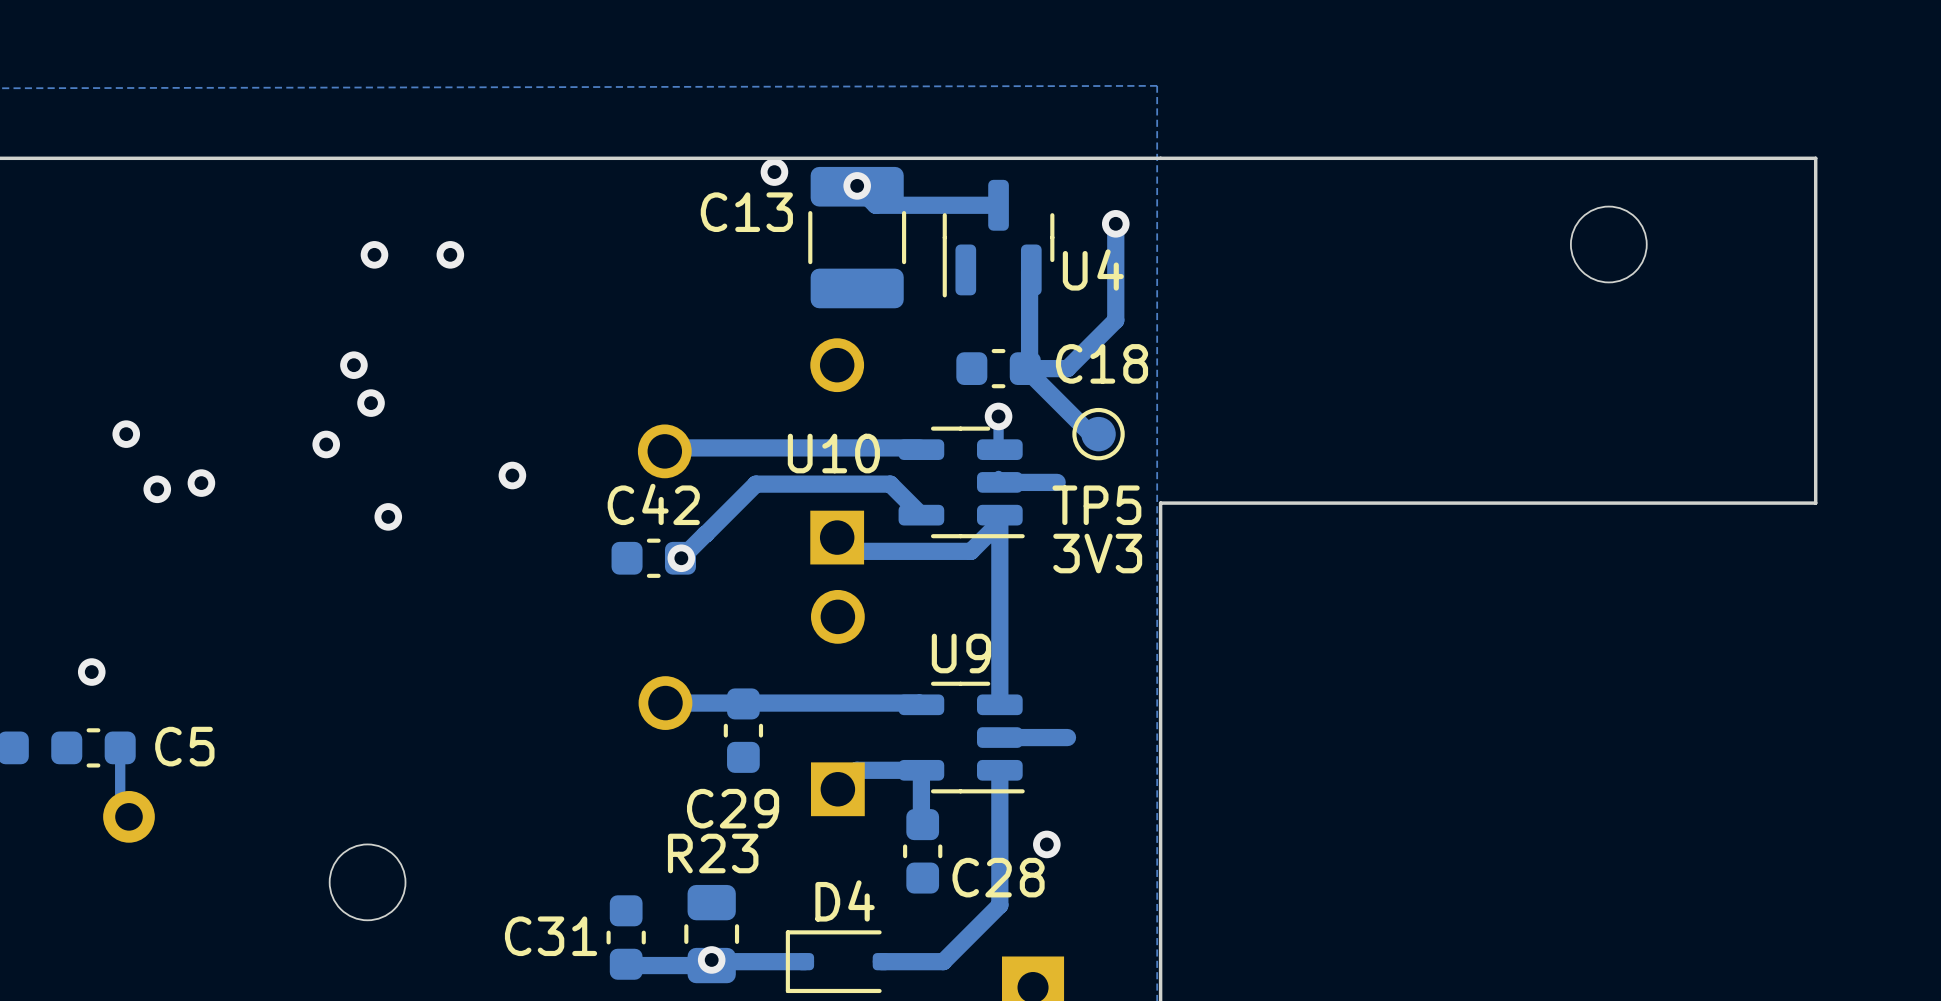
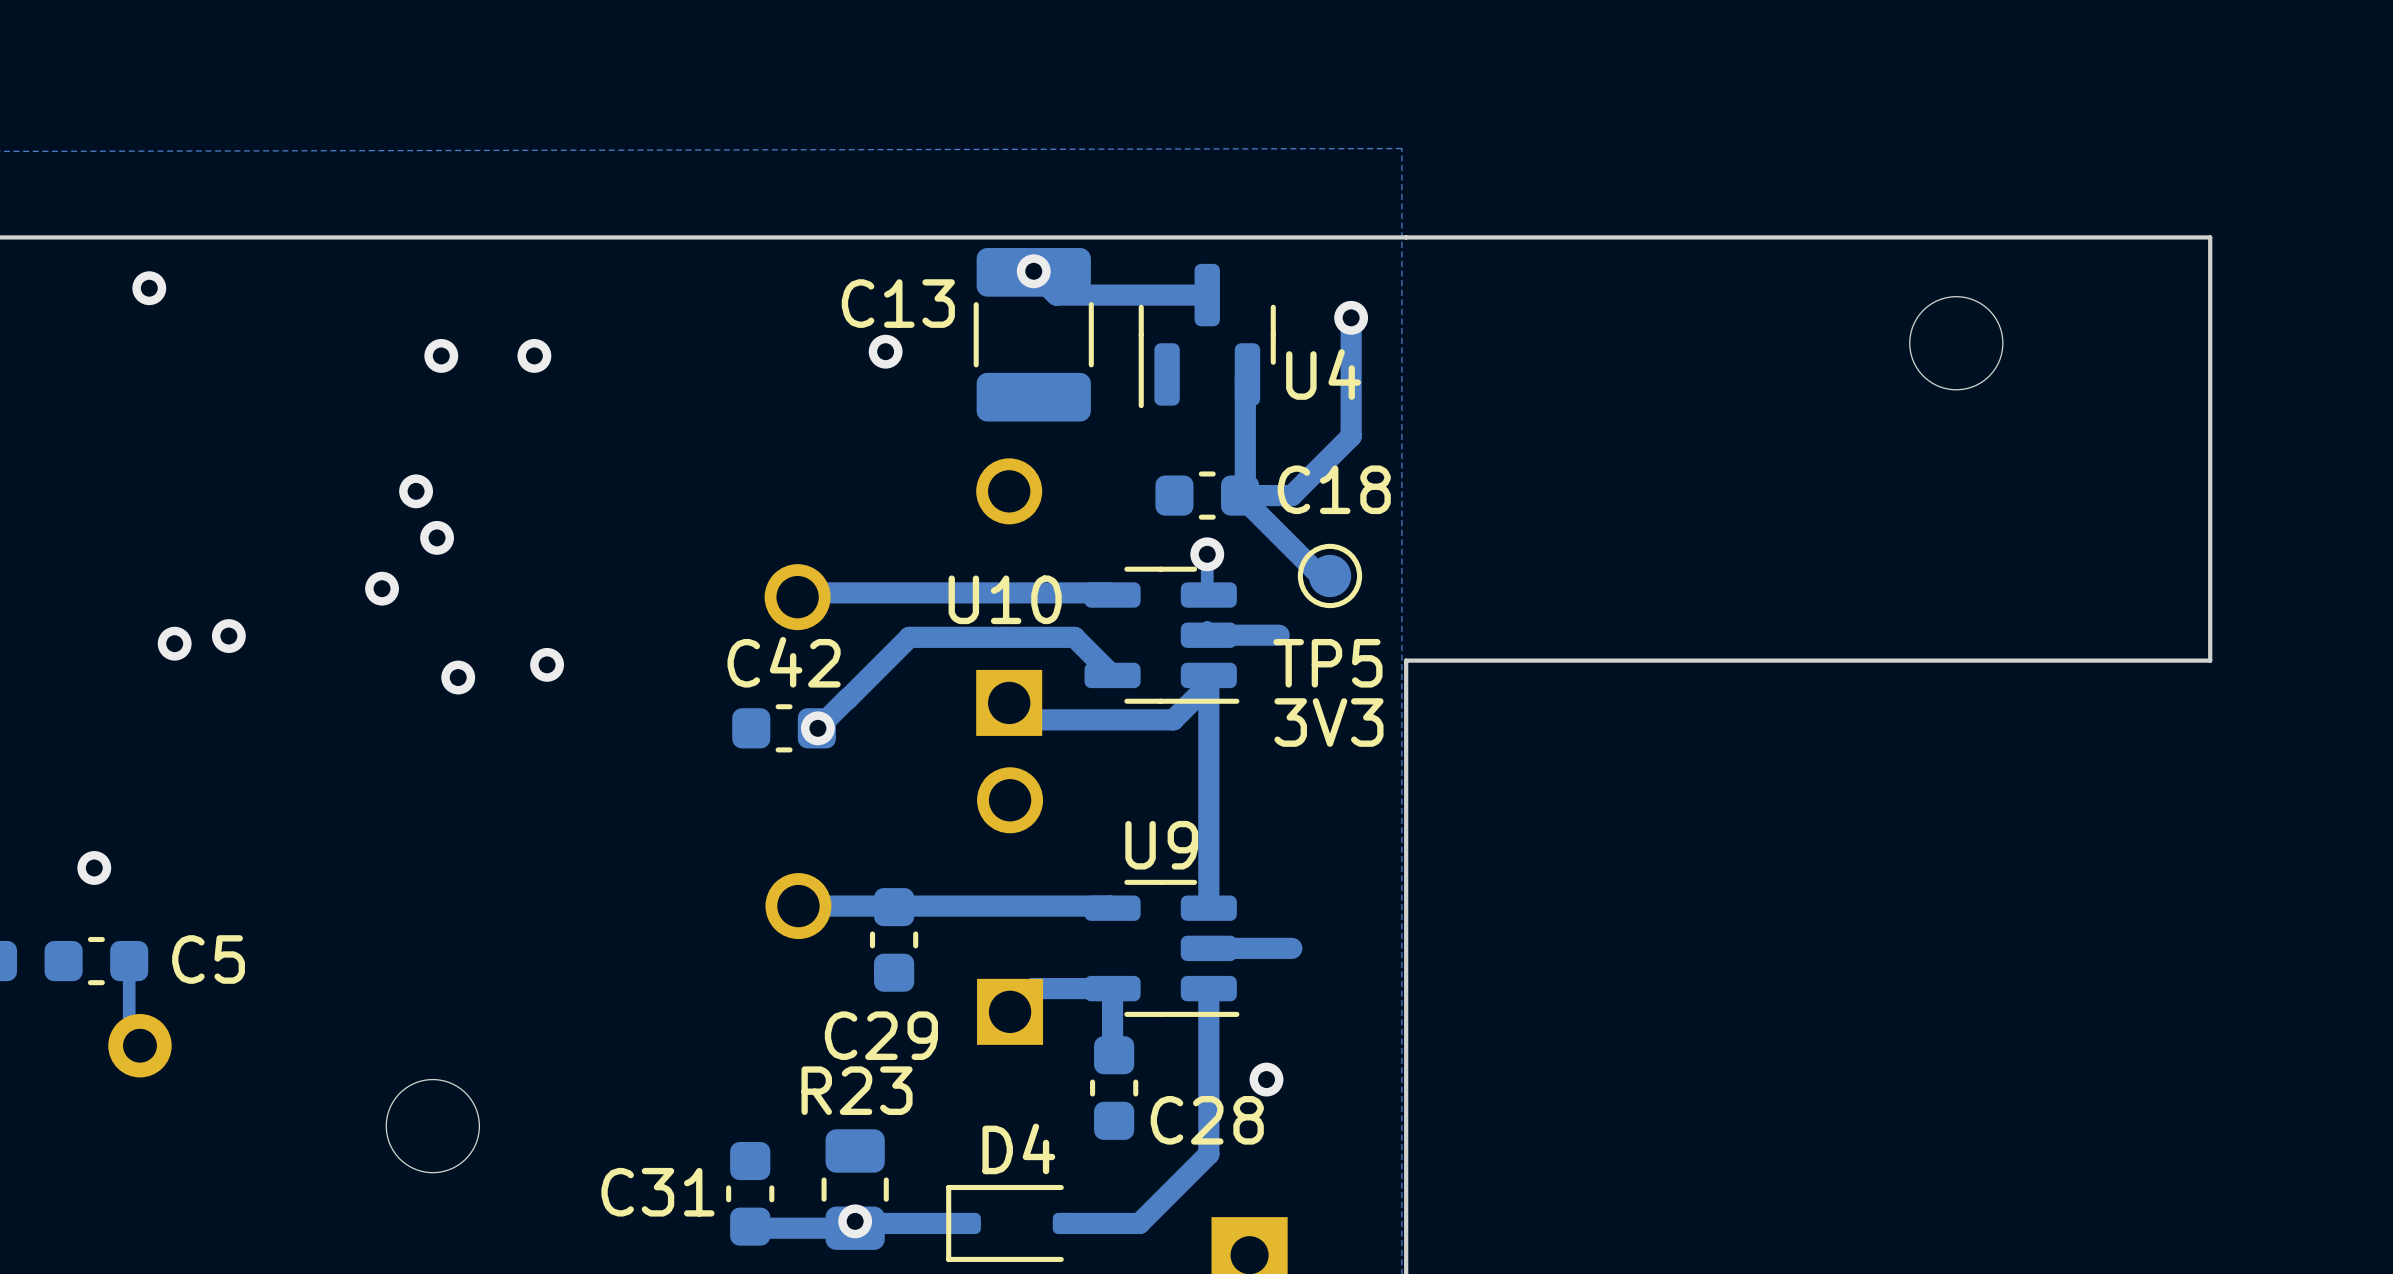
via position: (774, 172) -> (885, 351)
via: none -> (149, 288)
via: (126, 434) -> none
via position: (512, 475) -> (547, 664)

